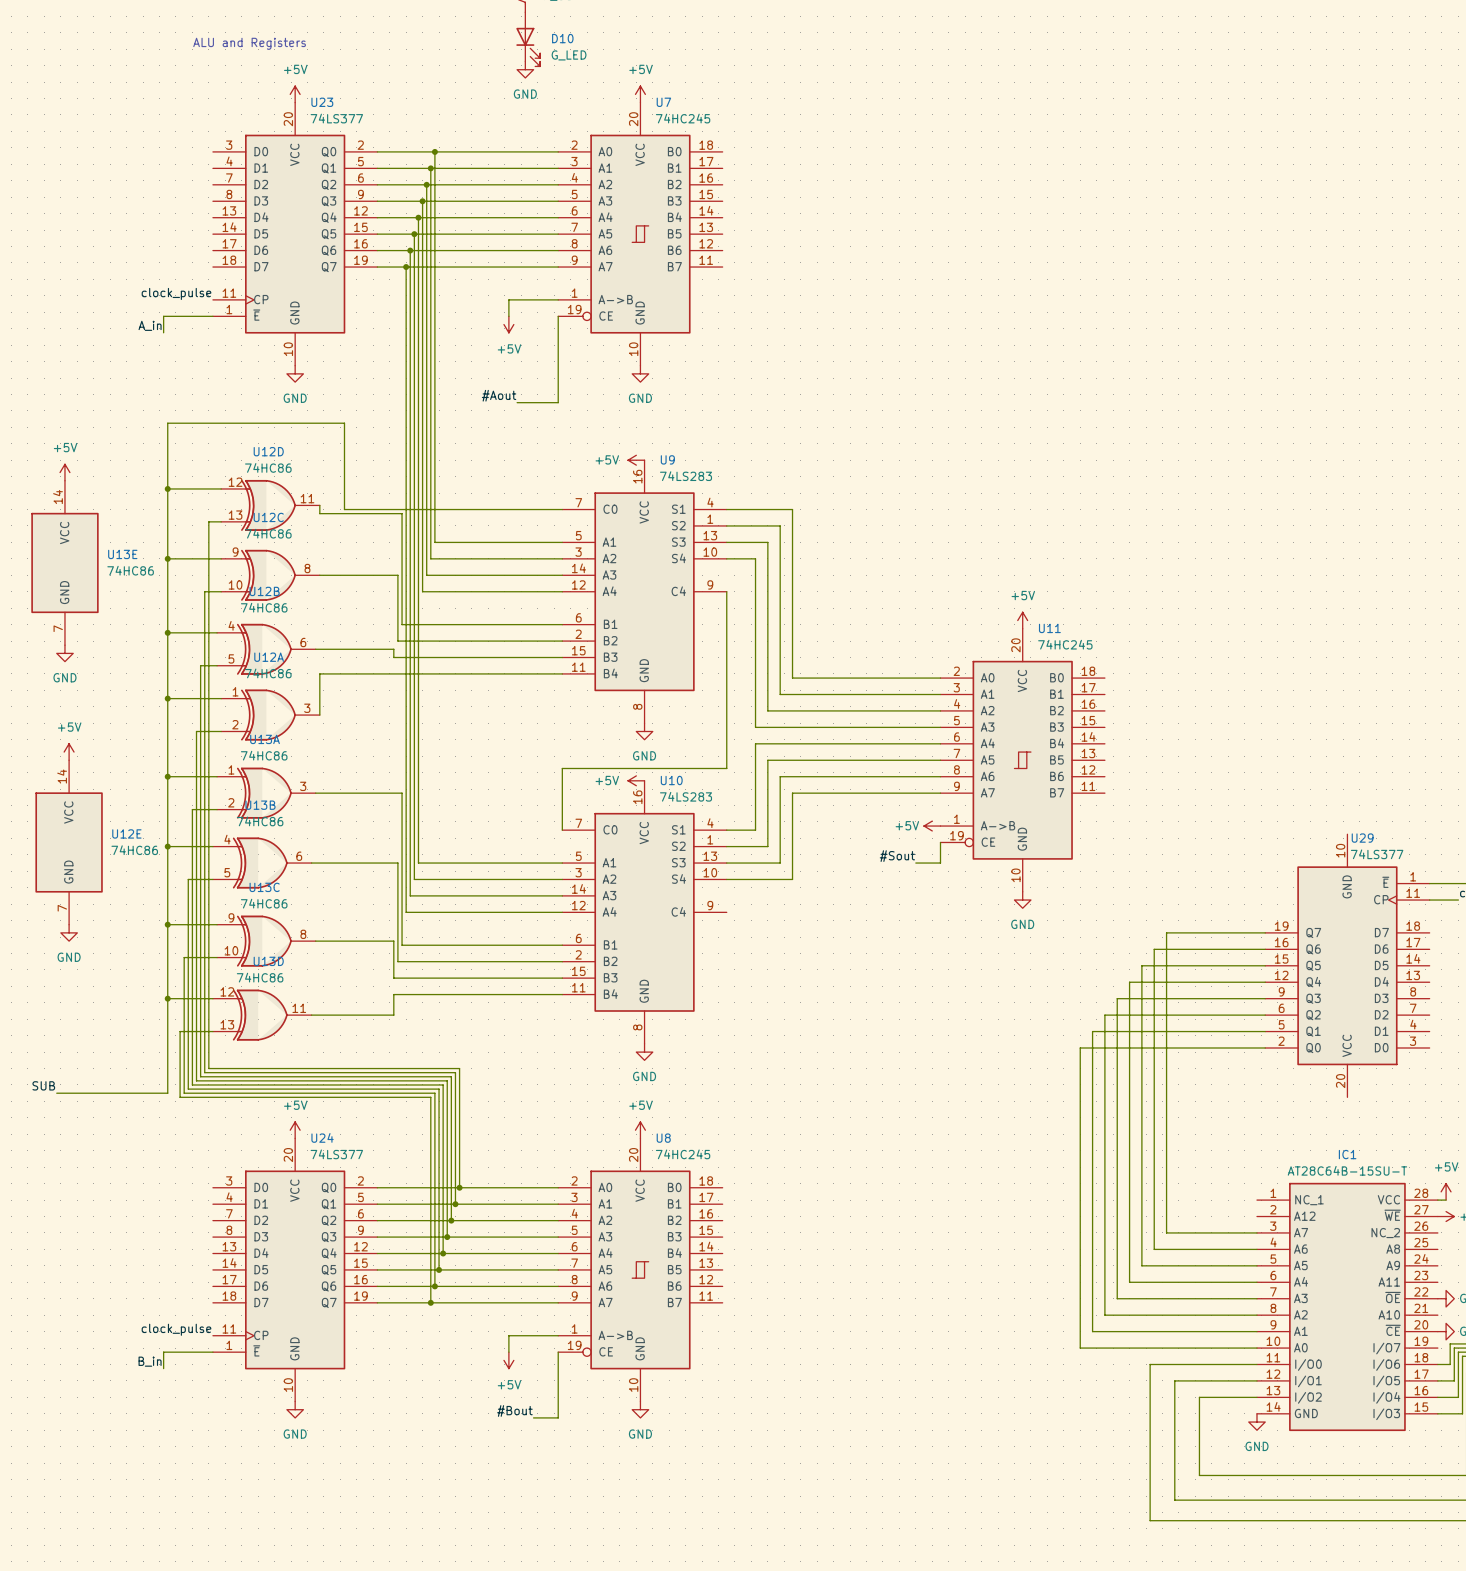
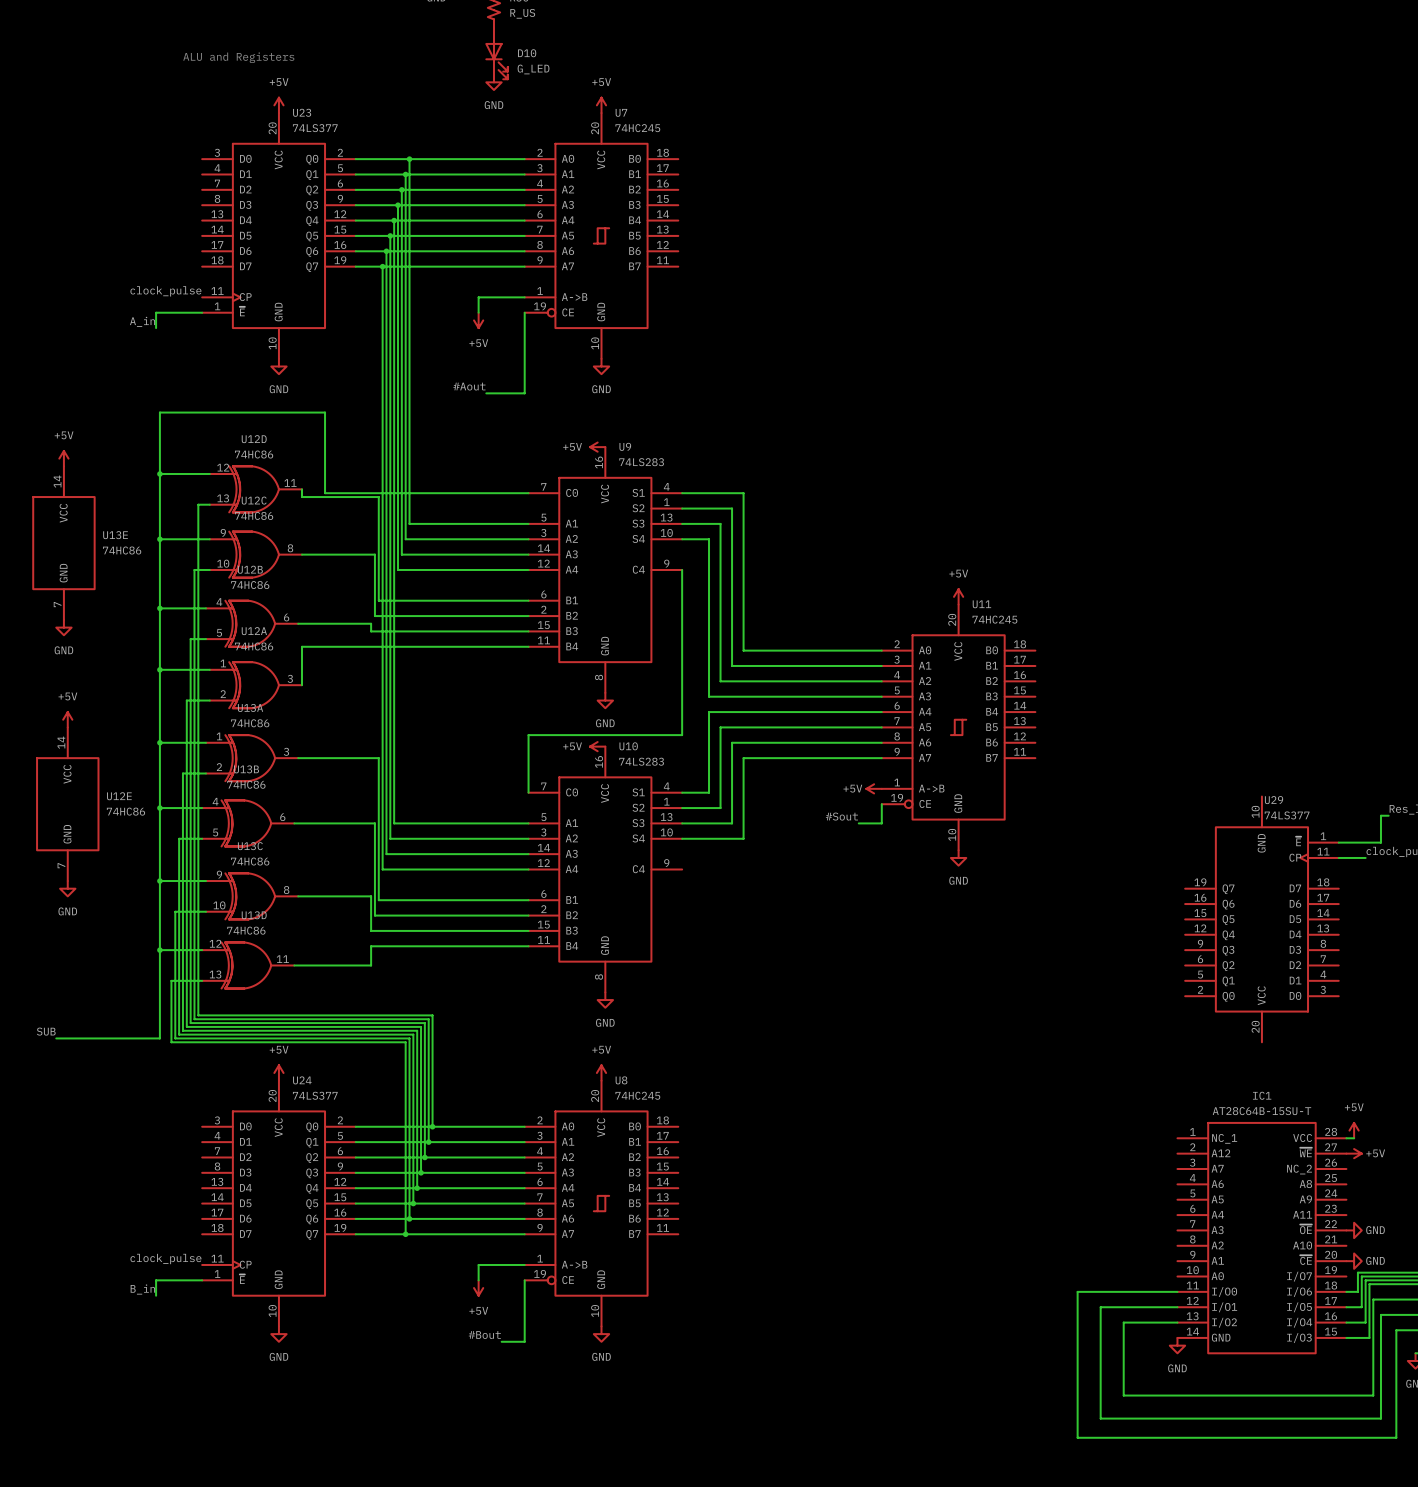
wire: (1265, 932) (1166, 932) (1166, 1232) (1256, 1232) -> none
wire: (1265, 949) (1154, 949) (1154, 1249) (1256, 1249) -> none
wire: (1265, 965) (1141, 965) (1141, 1265) (1256, 1265) -> none
wire: (1265, 982) (1129, 982) (1129, 1282) (1256, 1282) -> none
wire: (1265, 998) (1117, 998) (1117, 1298) (1256, 1298) -> none
wire: (1265, 1015) (1104, 1015) (1104, 1315) (1256, 1315) -> none
wire: (1265, 1031) (1092, 1031) (1092, 1331) (1256, 1331) -> none
wire: (1265, 1047) (1080, 1047) (1080, 1348) (1256, 1348) -> none

